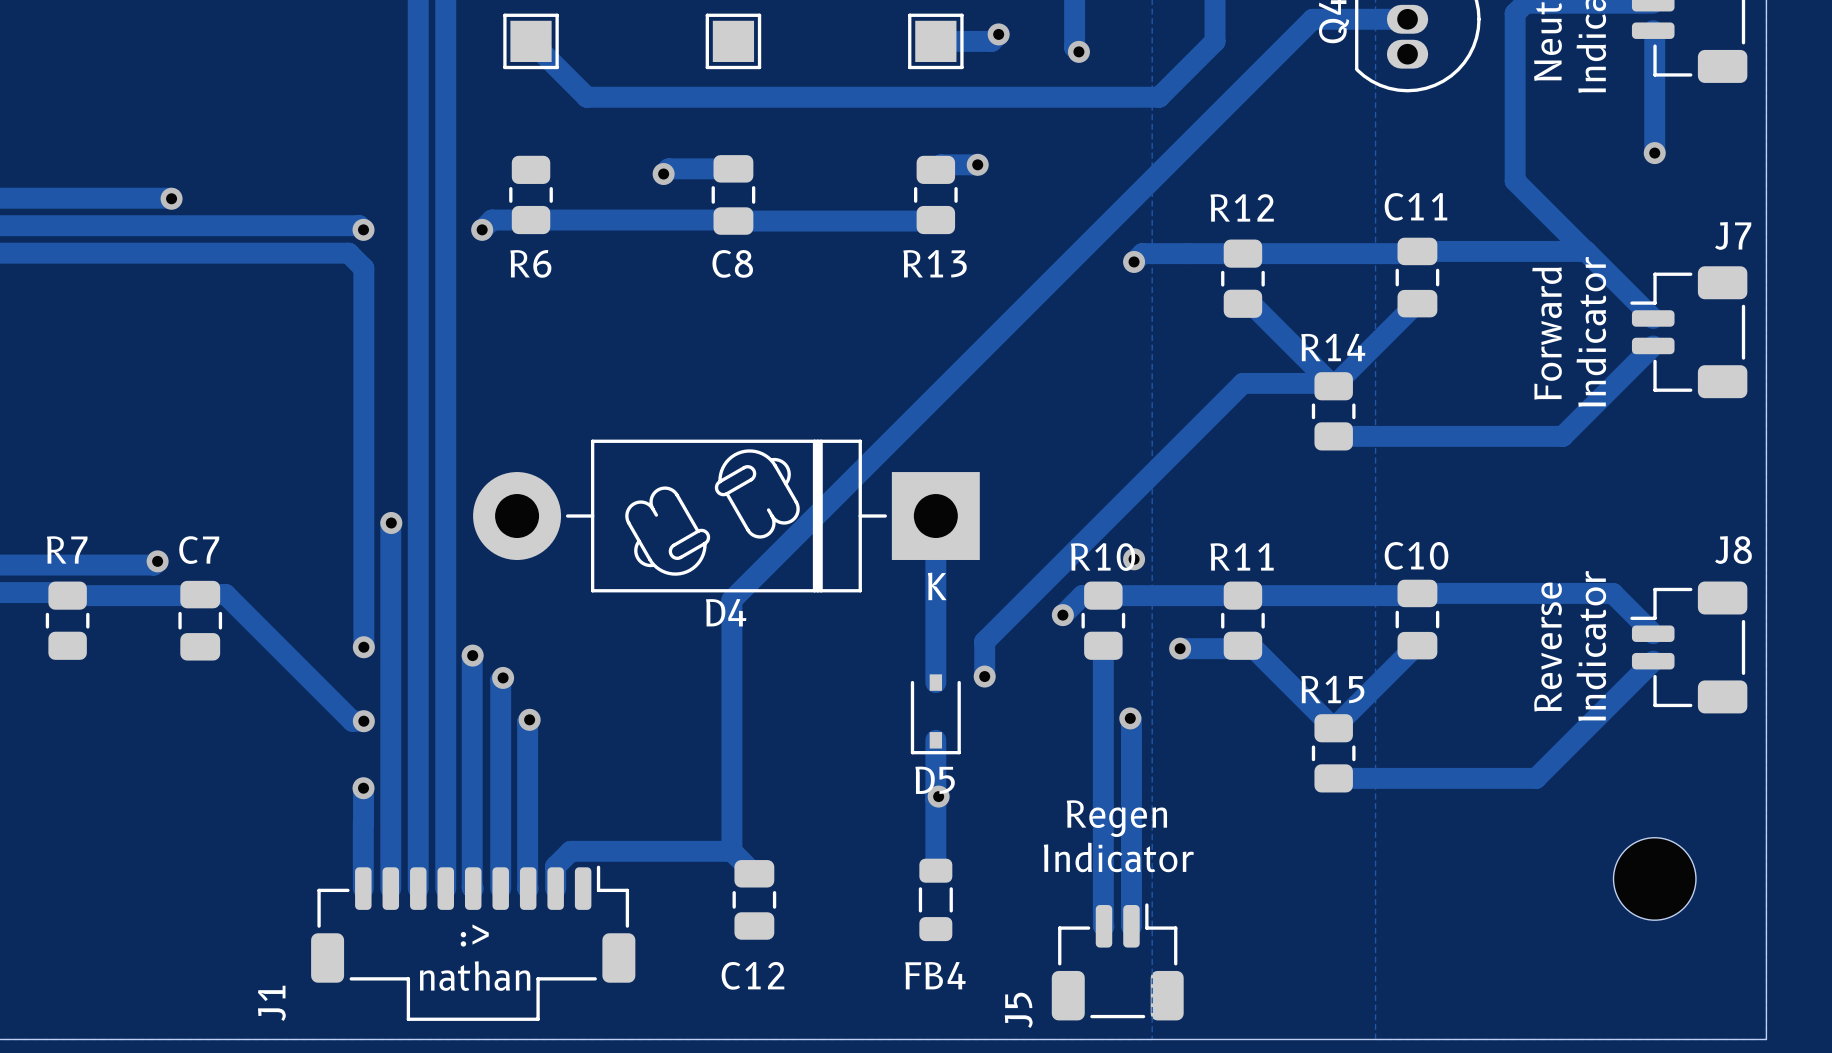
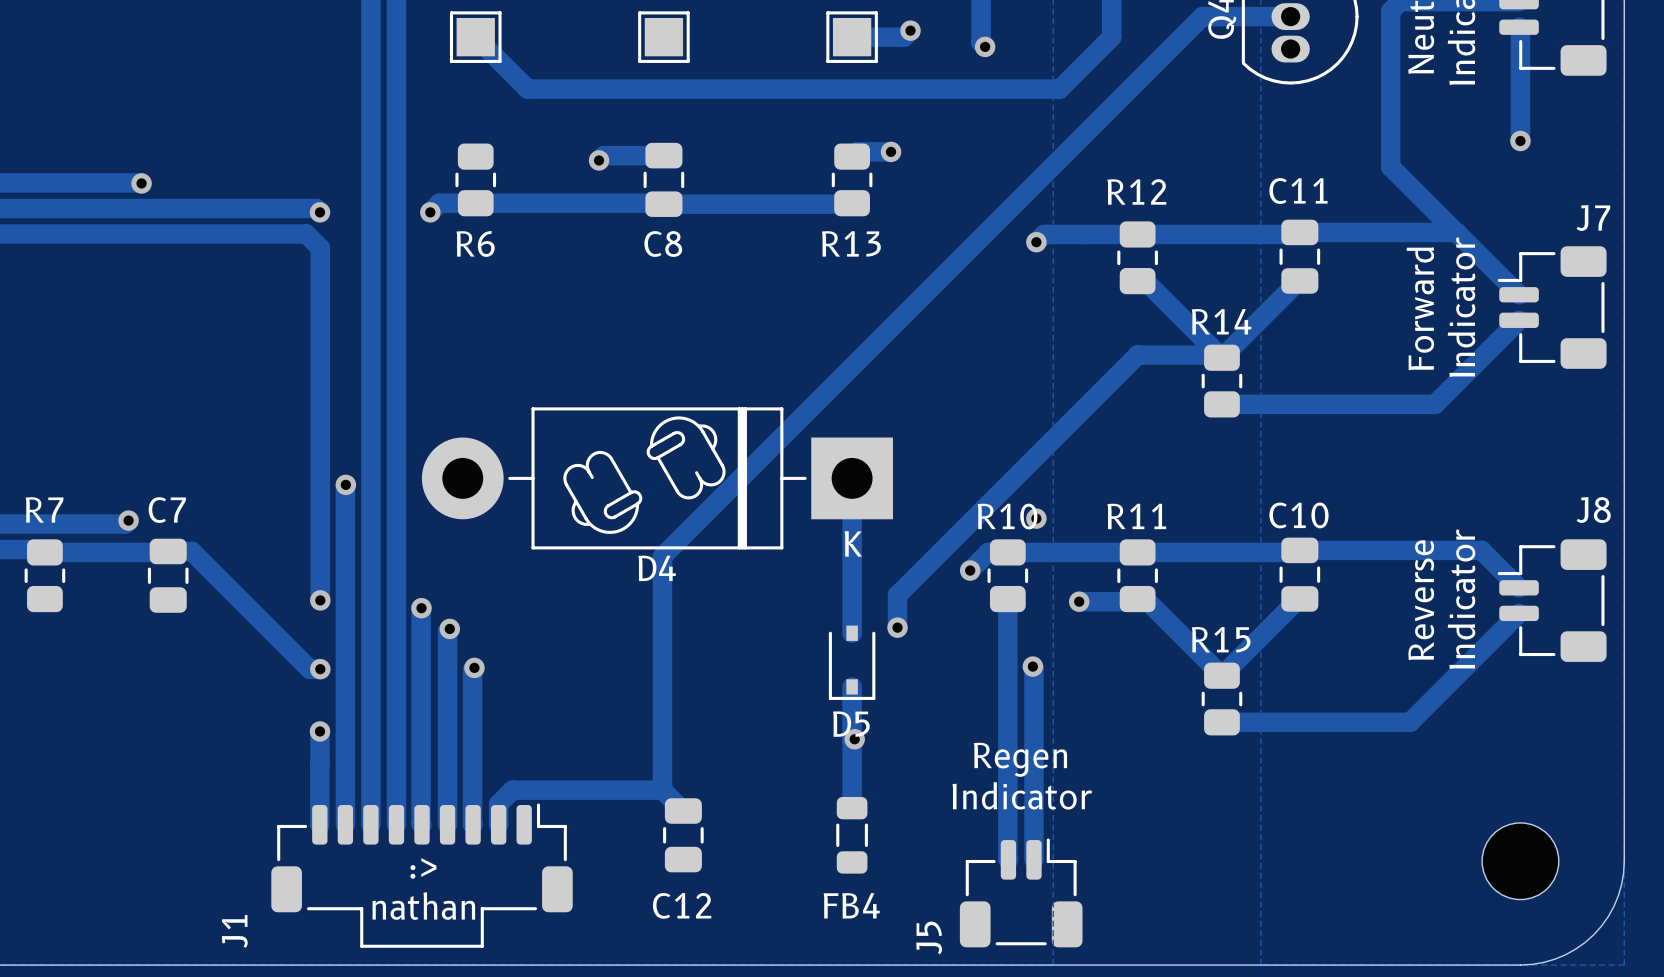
part position: (1654, 878) -> (1520, 861)
board edge: (1766, 927) (1766, 1039) (1654, 1039) -> (1624, 861) (1621, 884) (1614, 906) (1593, 934) (1575, 949) (1554, 959) (1520, 965)

